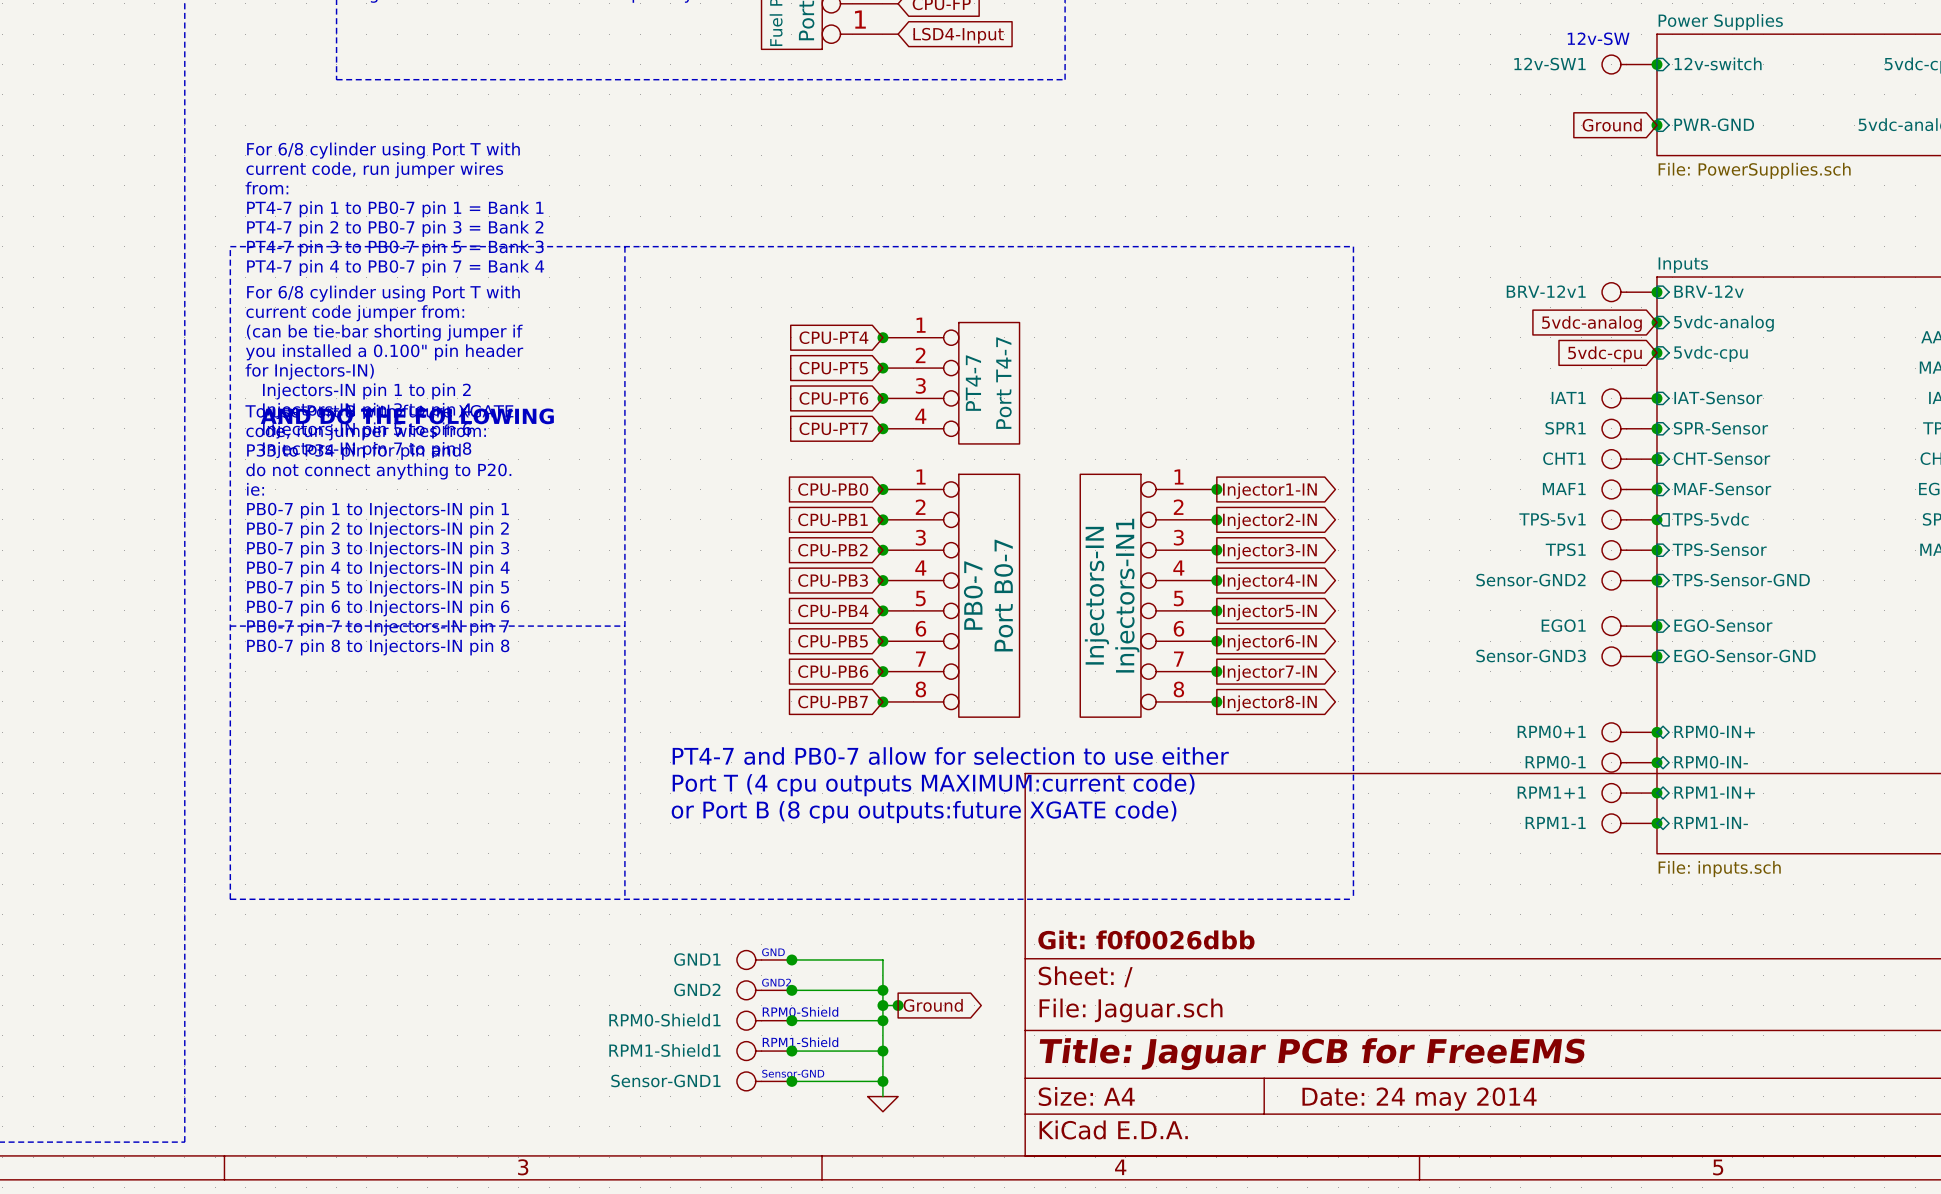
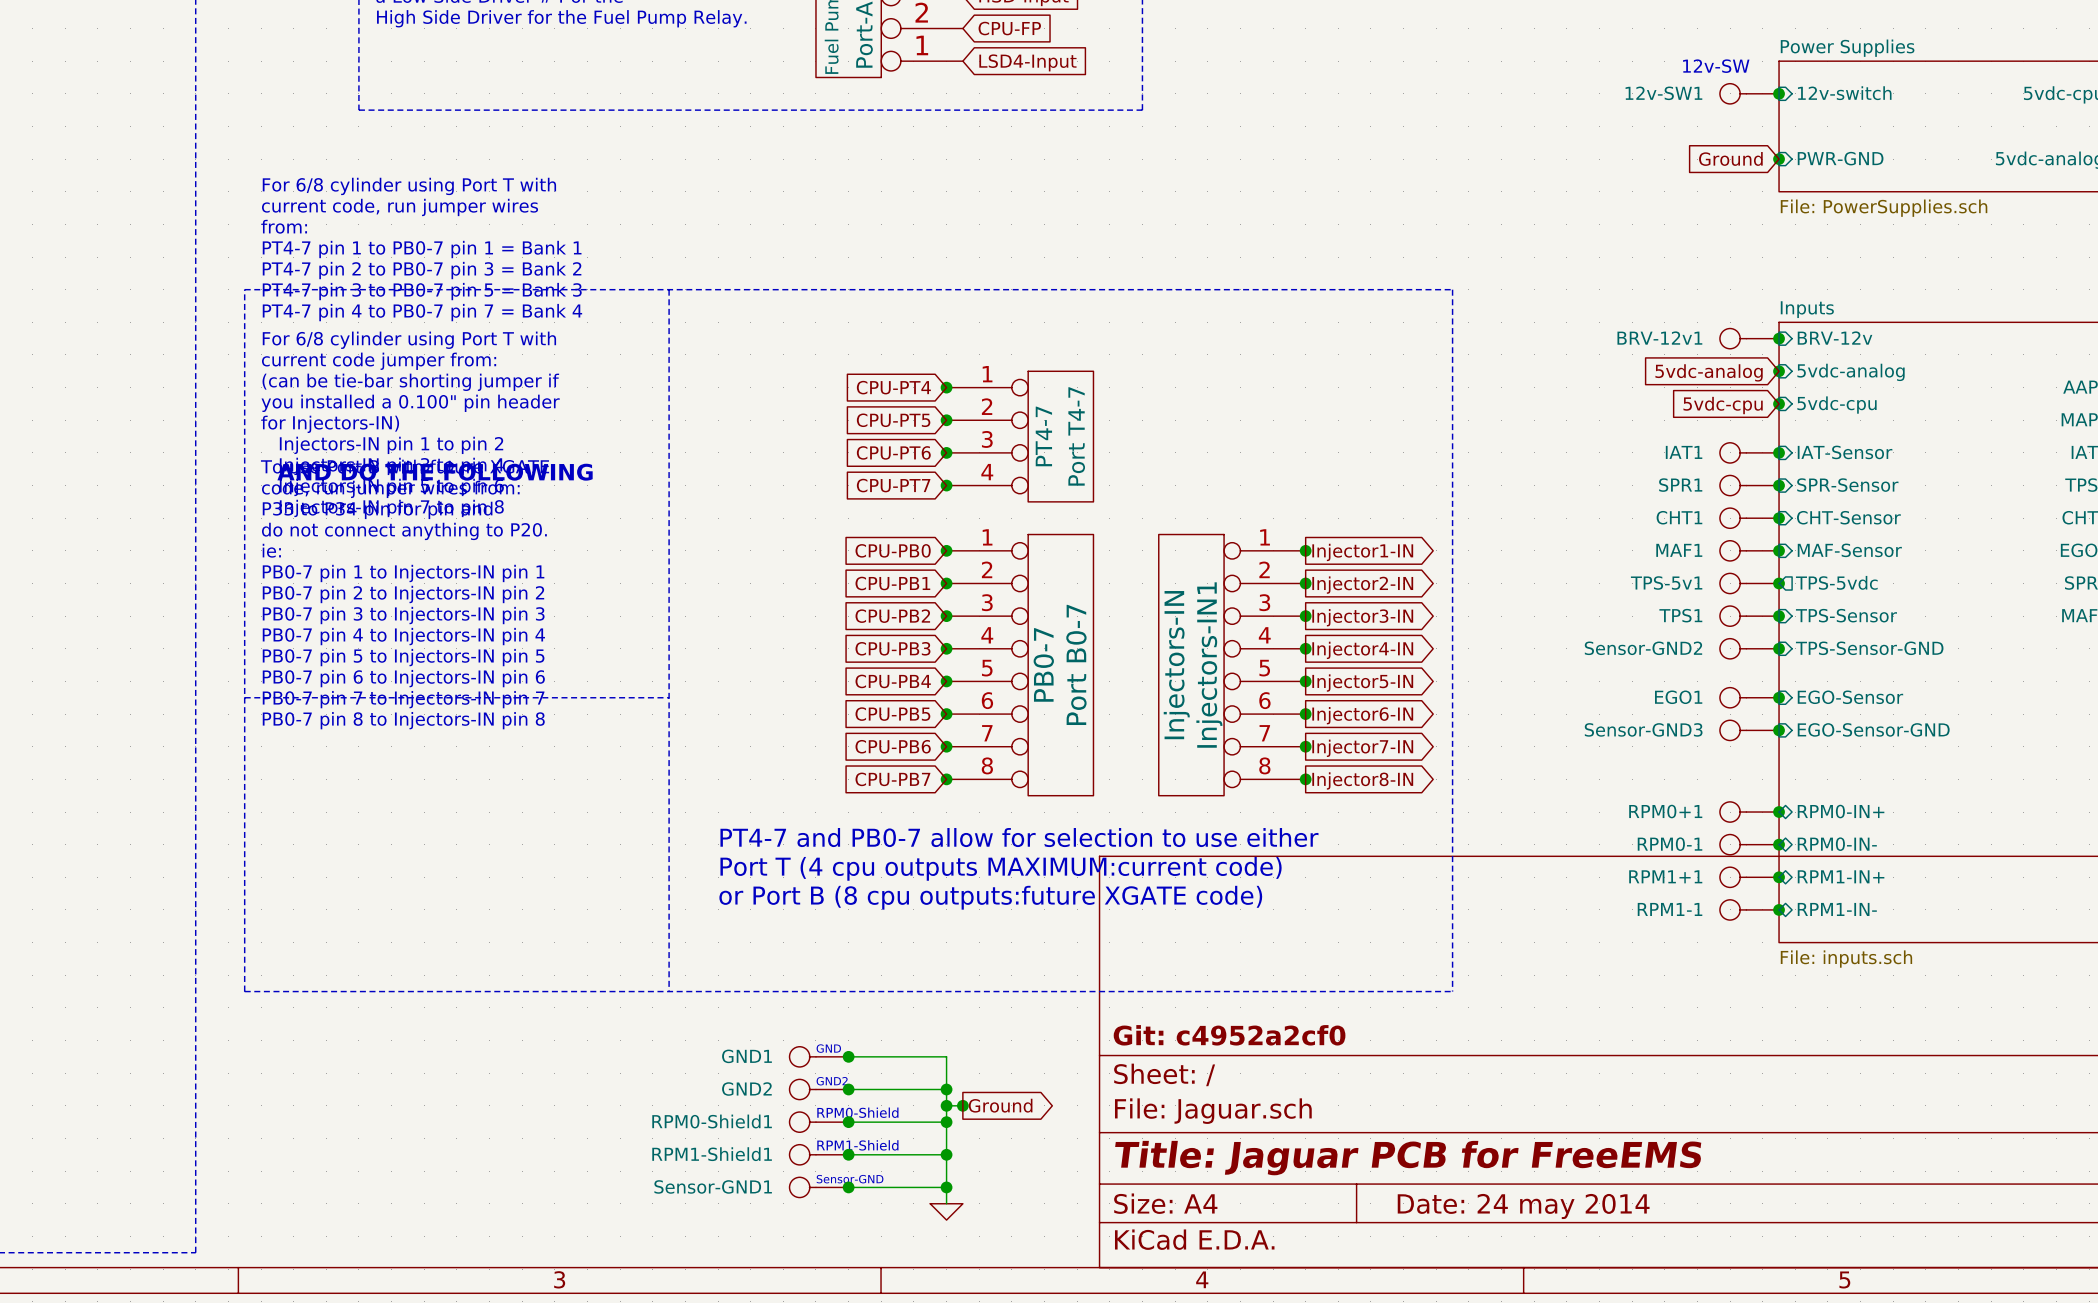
title block: Git: f0f0026dbb (1146, 939) -> Git: c4952a2cf0 (1229, 1035)

